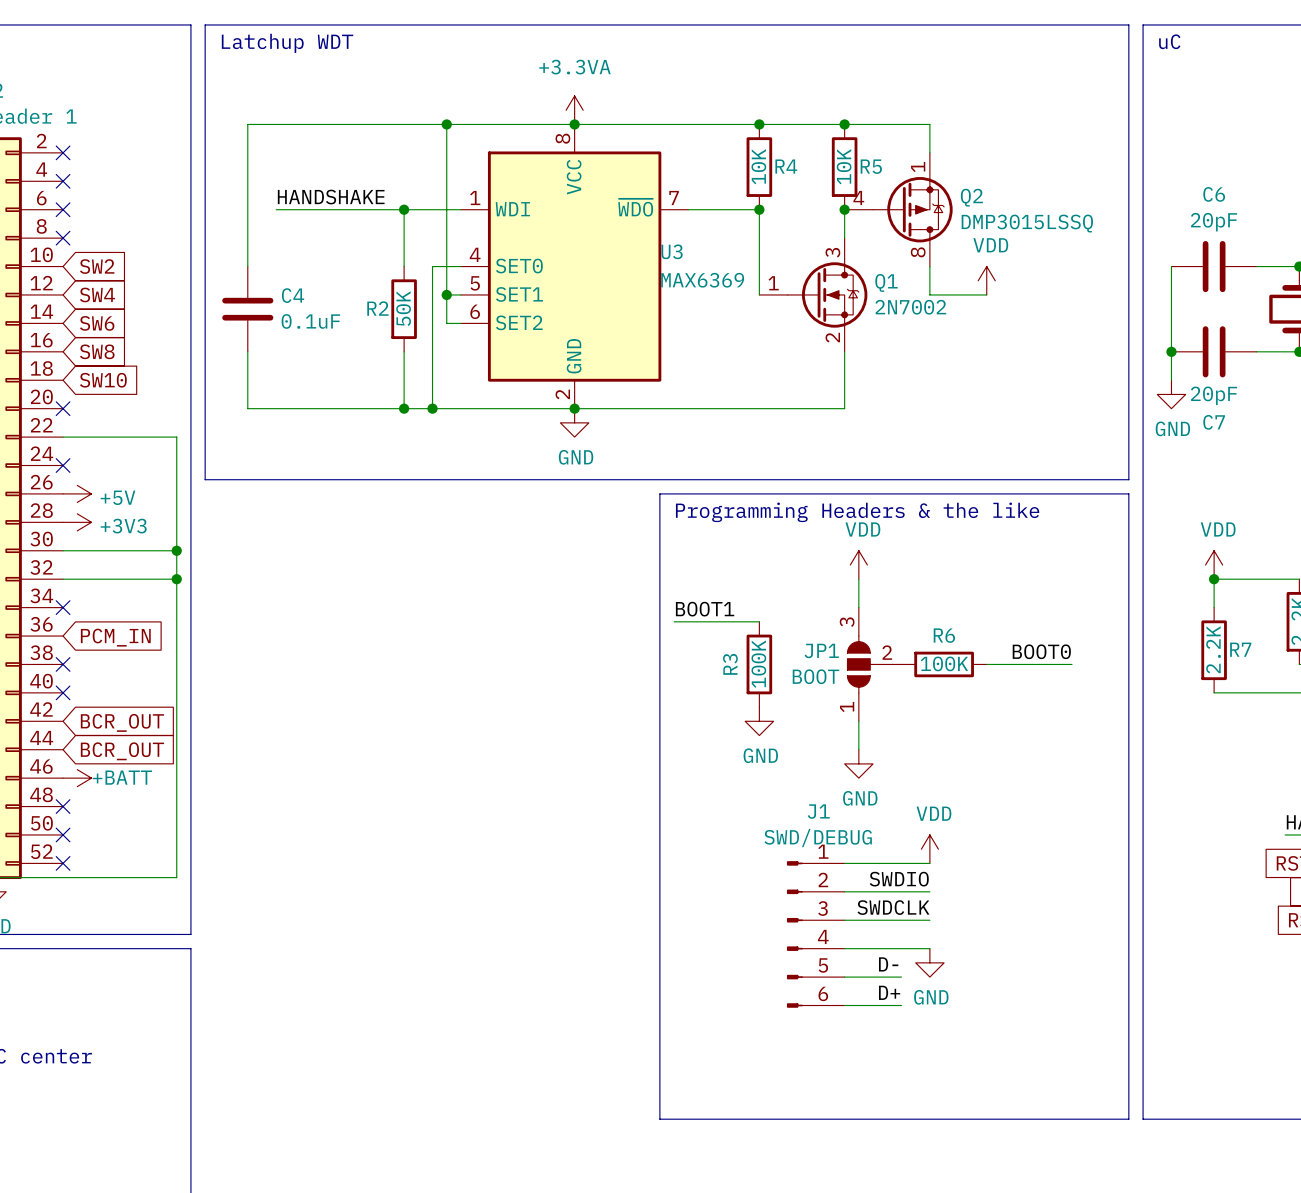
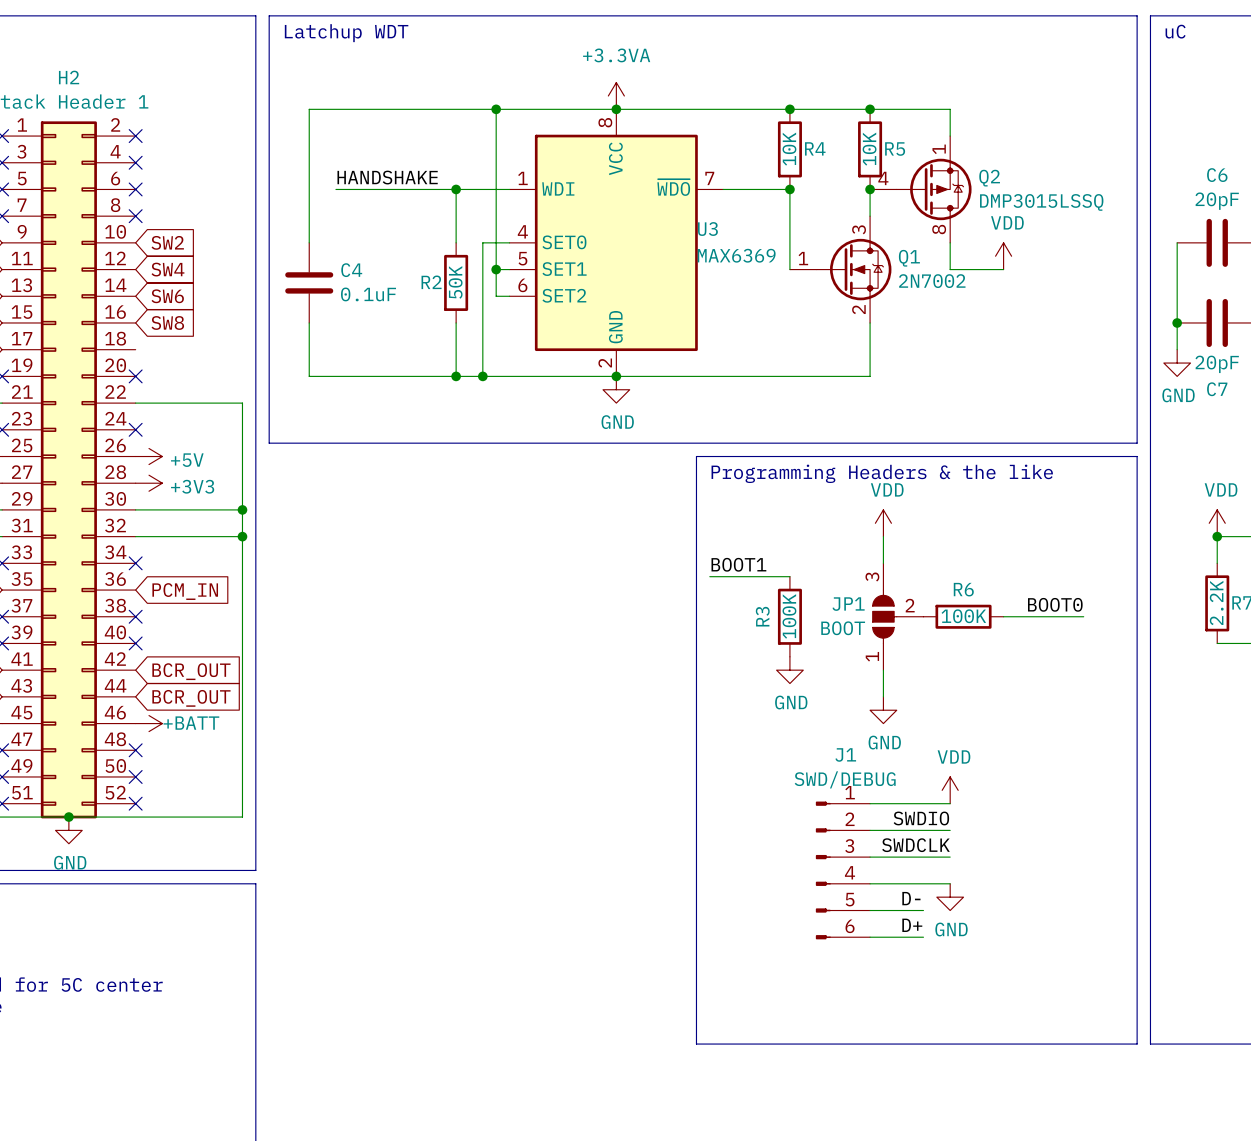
global label: SW10 (103, 380) -> none

